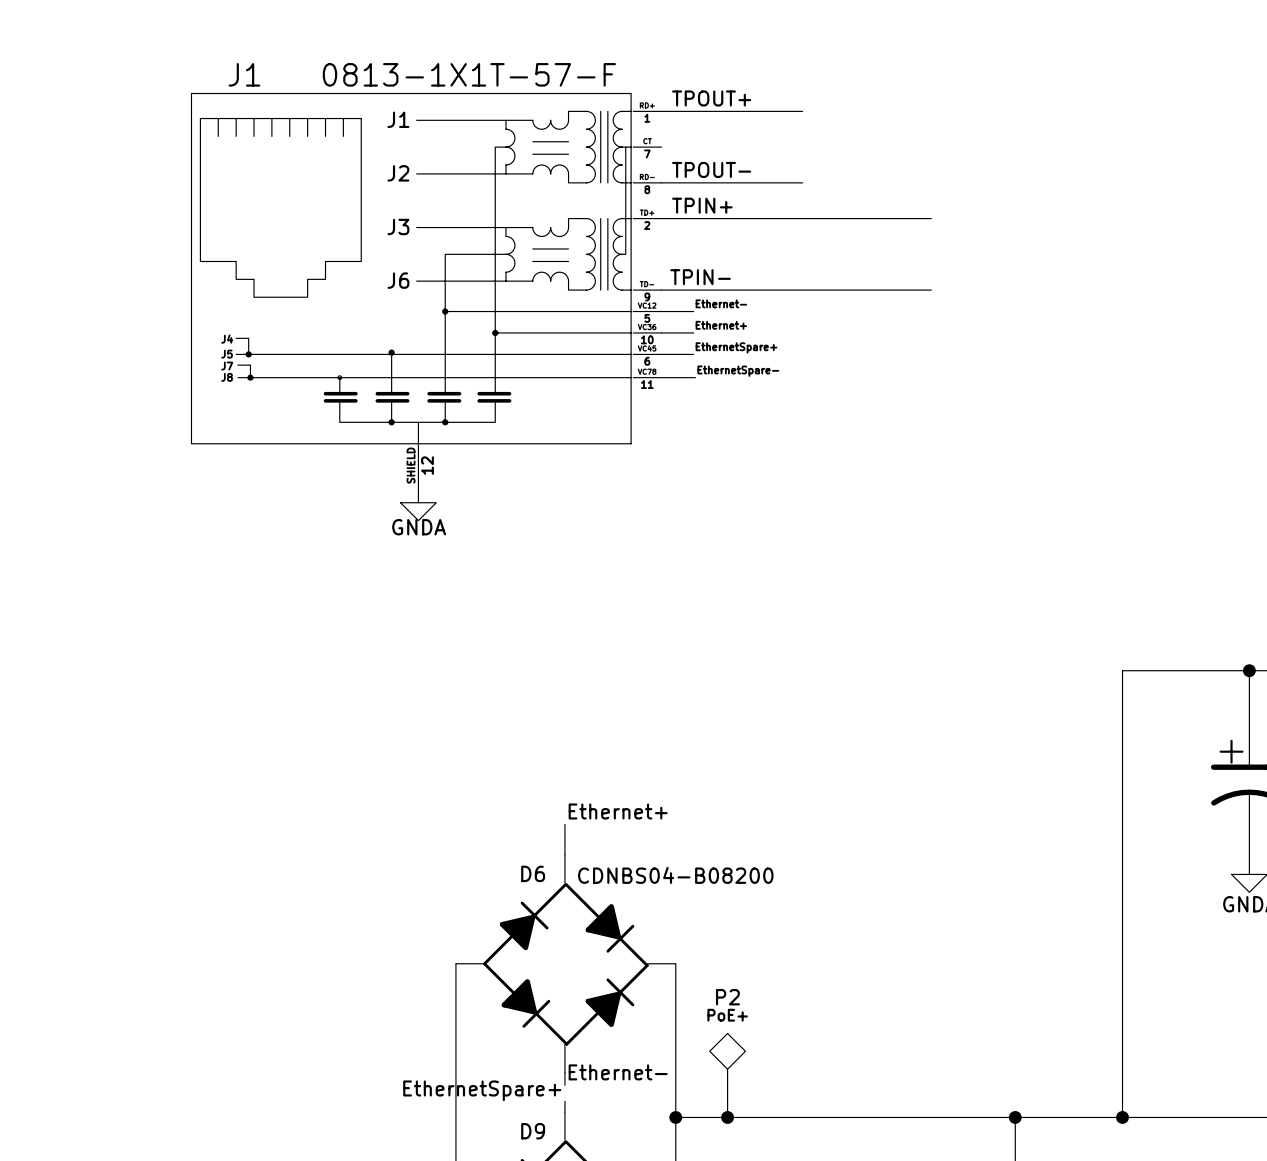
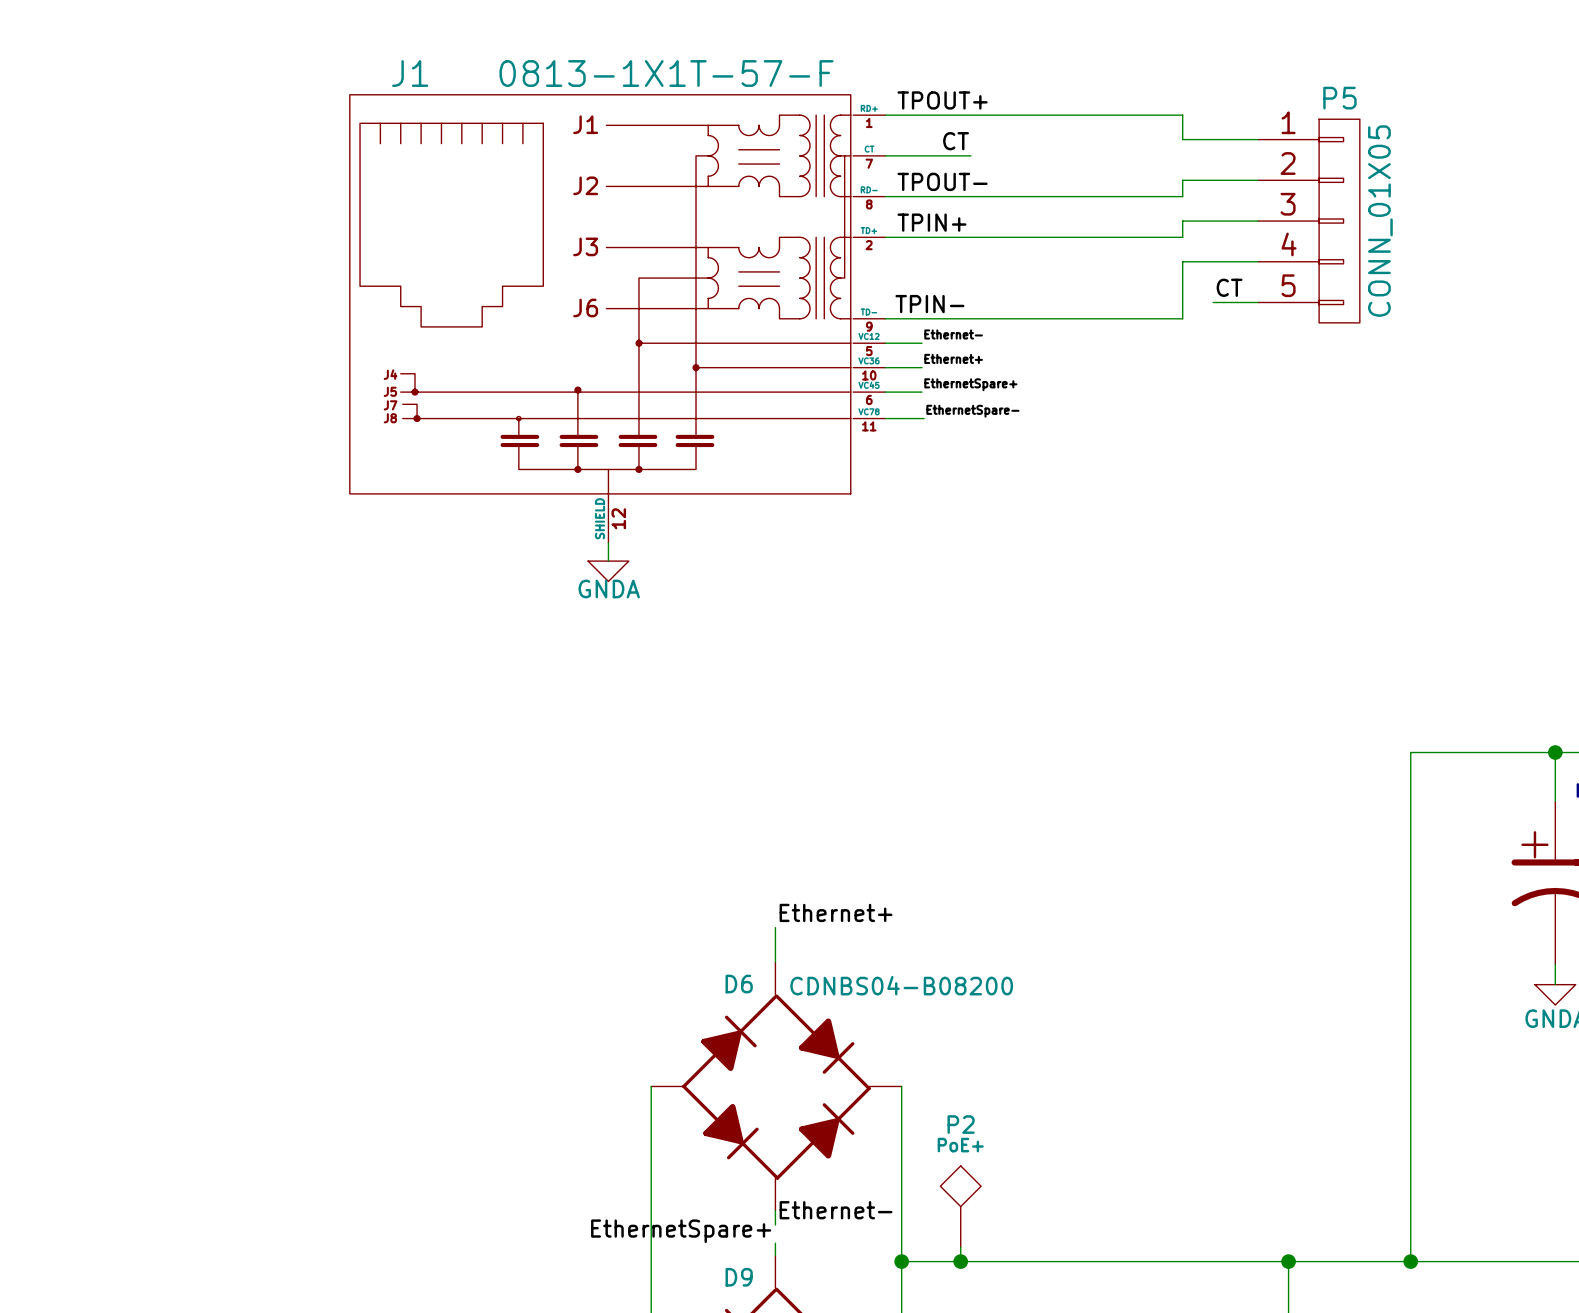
wire: none -> (1046, 115) (1182, 115) (1182, 139) (1258, 139)
label: none -> CT (956, 141)
wire: none -> (885, 155) (970, 155)
wire: none -> (1258, 180) (1182, 180) (1182, 196) (1046, 196)
P5: none -> CONN_01X05 (1308, 221)
wire: (922, 218) (931, 218) -> (1182, 237) (1182, 221) (1258, 221)
label: none -> CT (1229, 287)
wire: none -> (1213, 302) (1258, 302)
wire: (922, 290) (931, 290) -> (1182, 318) (1182, 261) (1258, 261)

